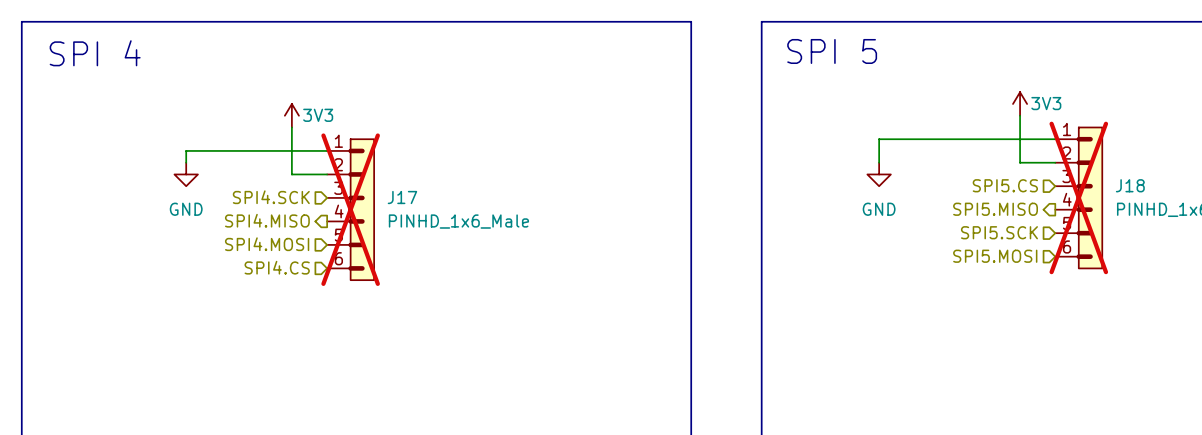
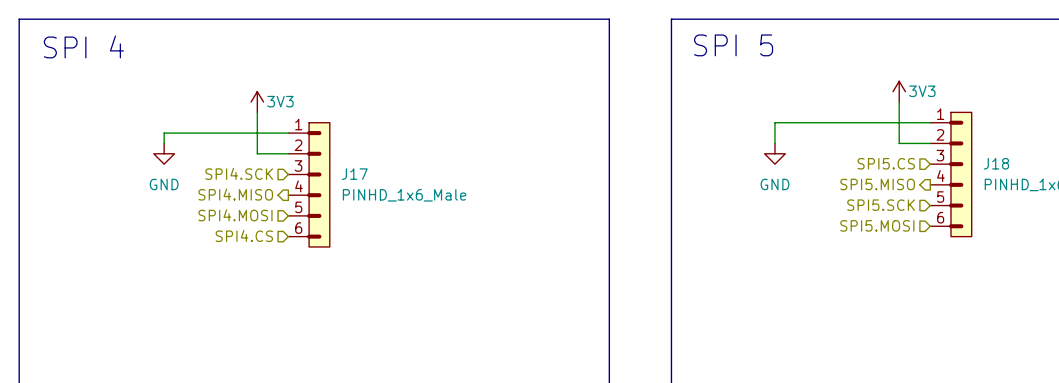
J18 do-not-place cross: (1078, 197) -> none
J17 do-not-place cross: (350, 209) -> none

